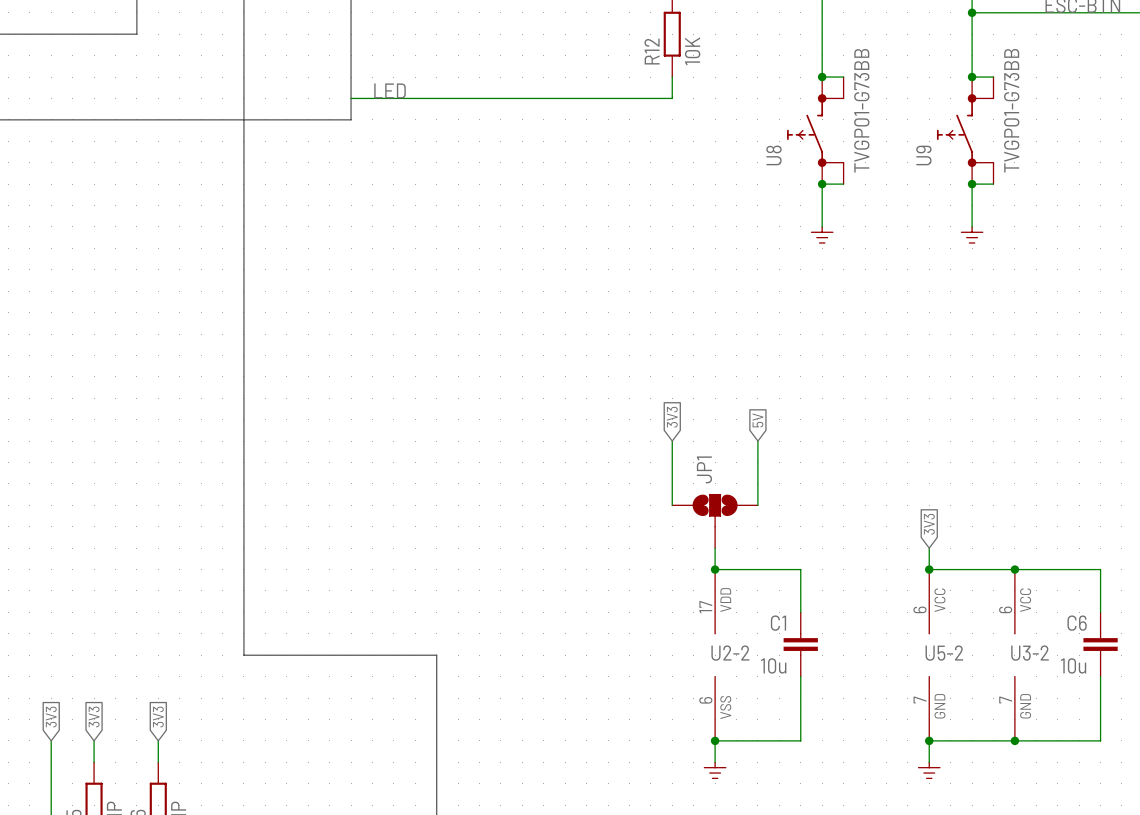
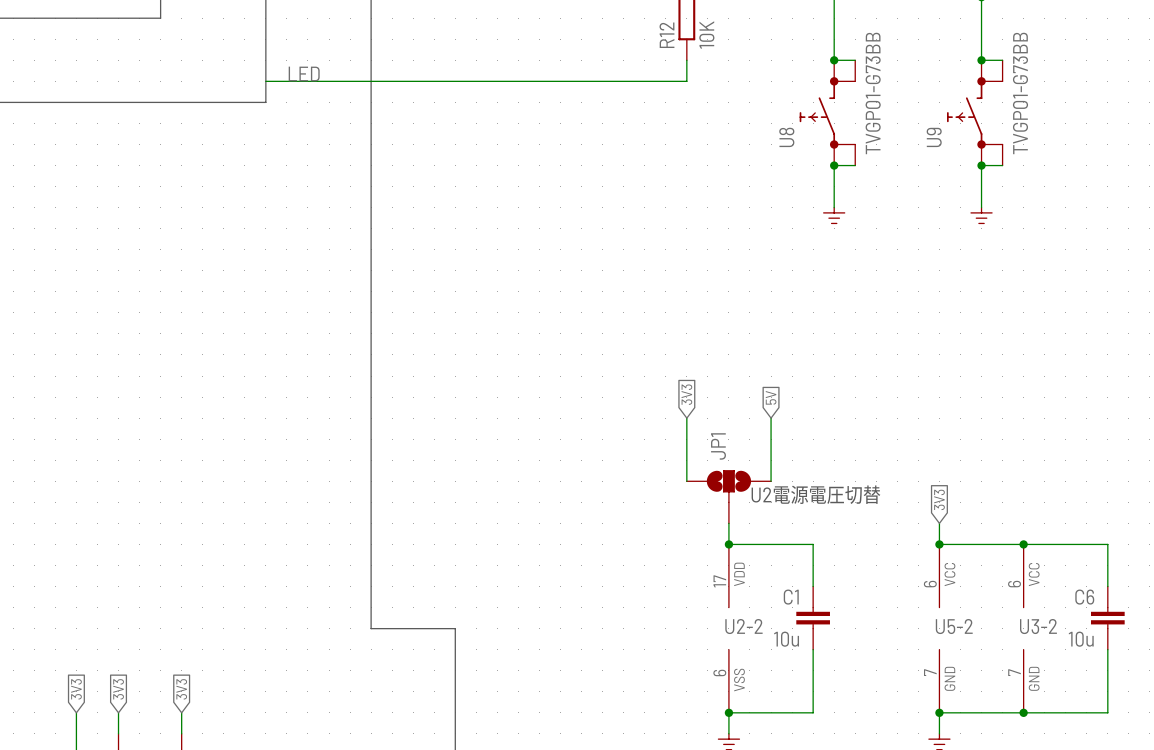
label position: LED (390, 90) -> LED (304, 73)
wire: none -> (265, 81) (371, 81)
bus: (351, 119) (243, 119) (243, 655) (351, 655) -> (371, 102) (371, 628)
text: none -> U2電源電圧切替 (815, 494)

